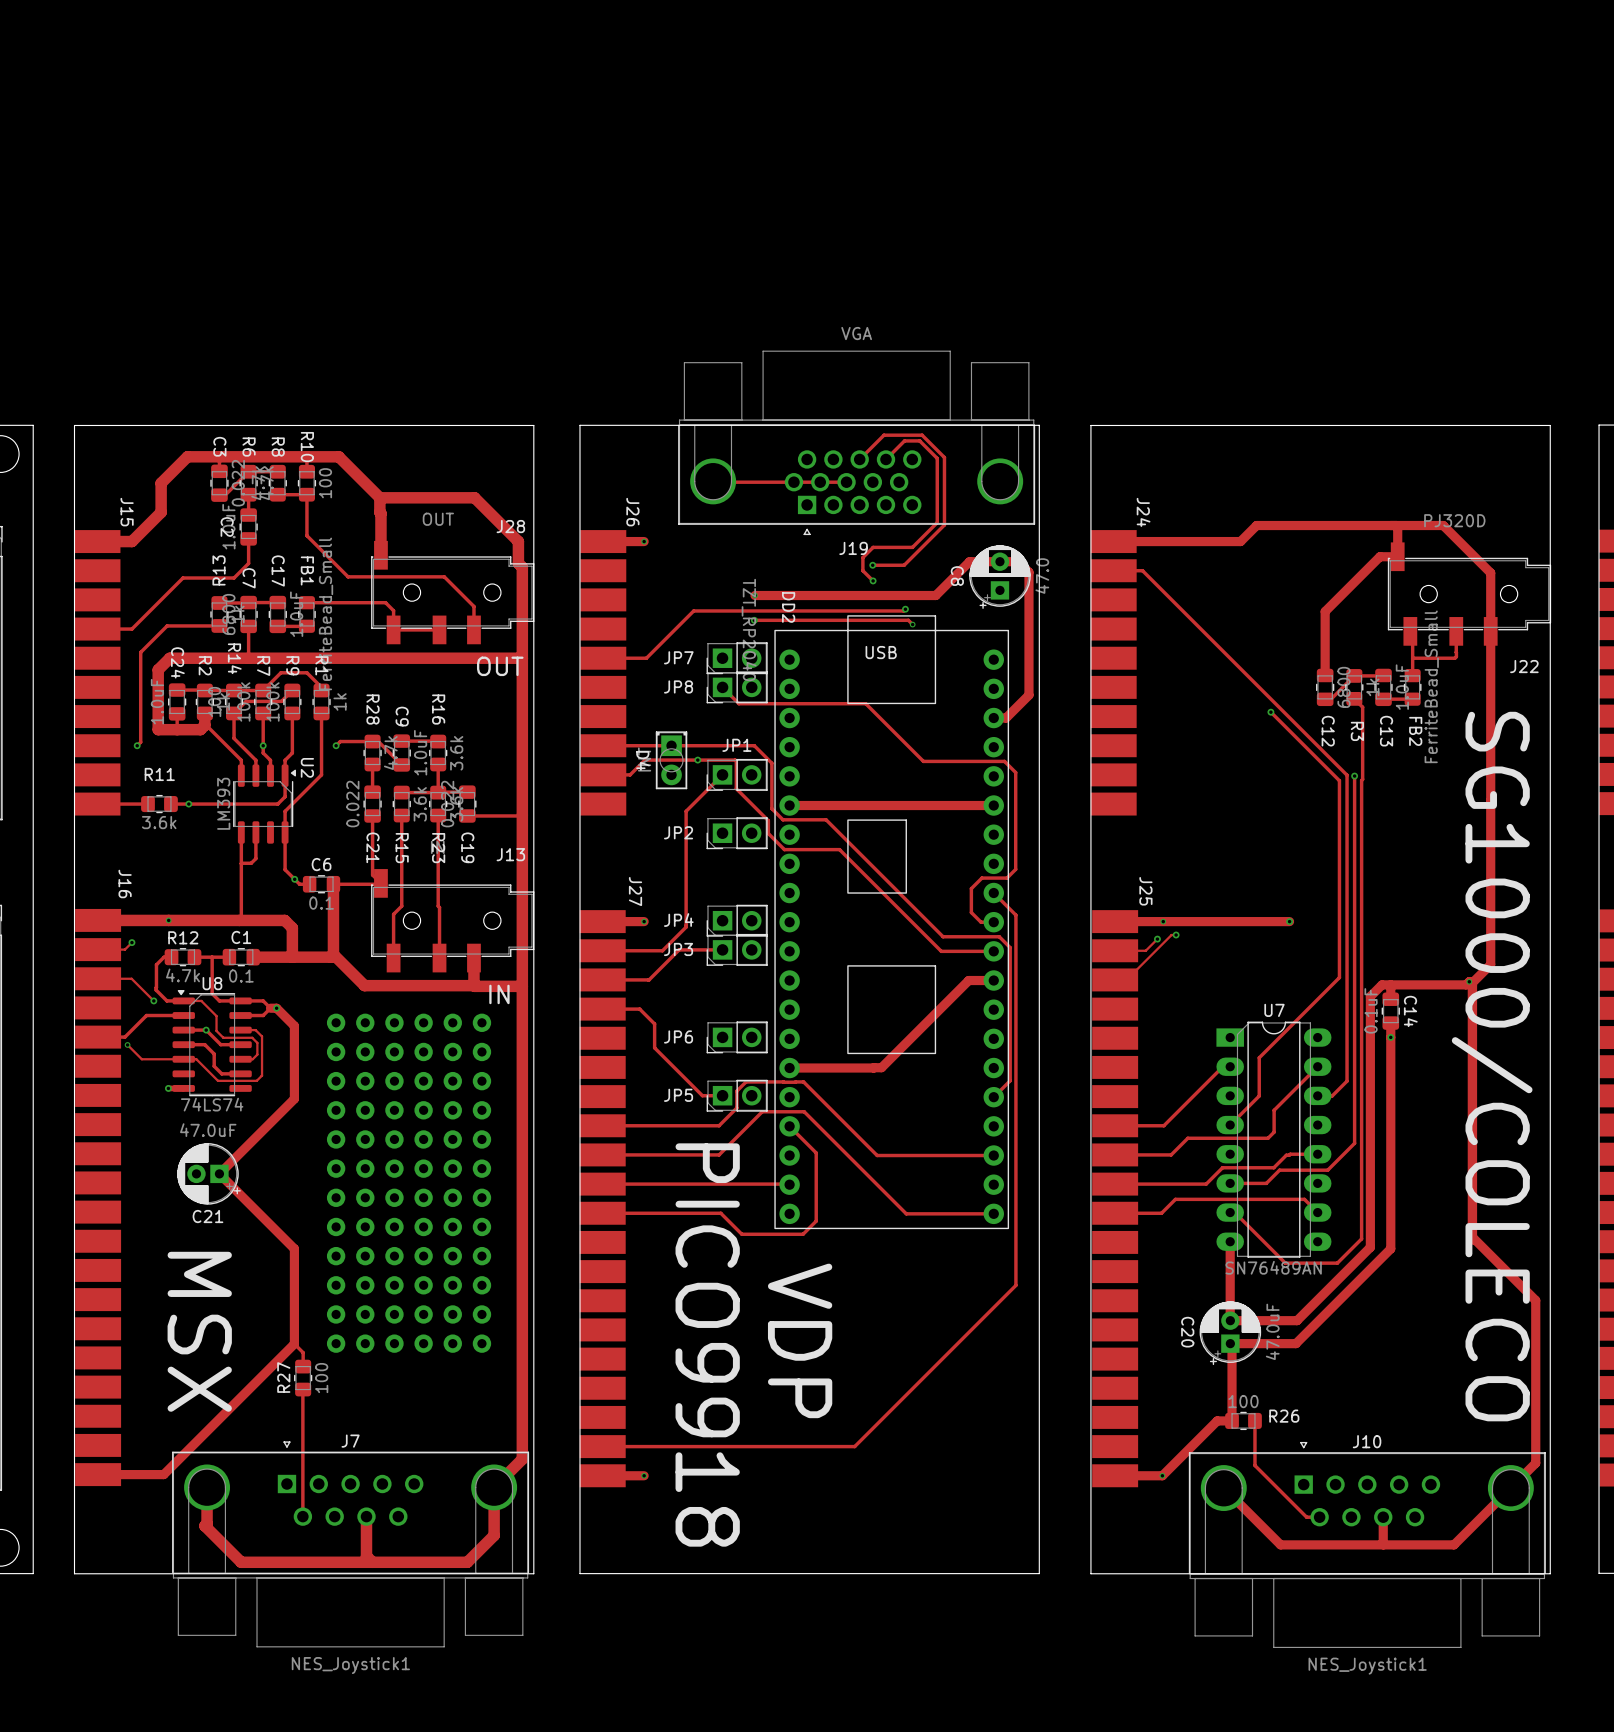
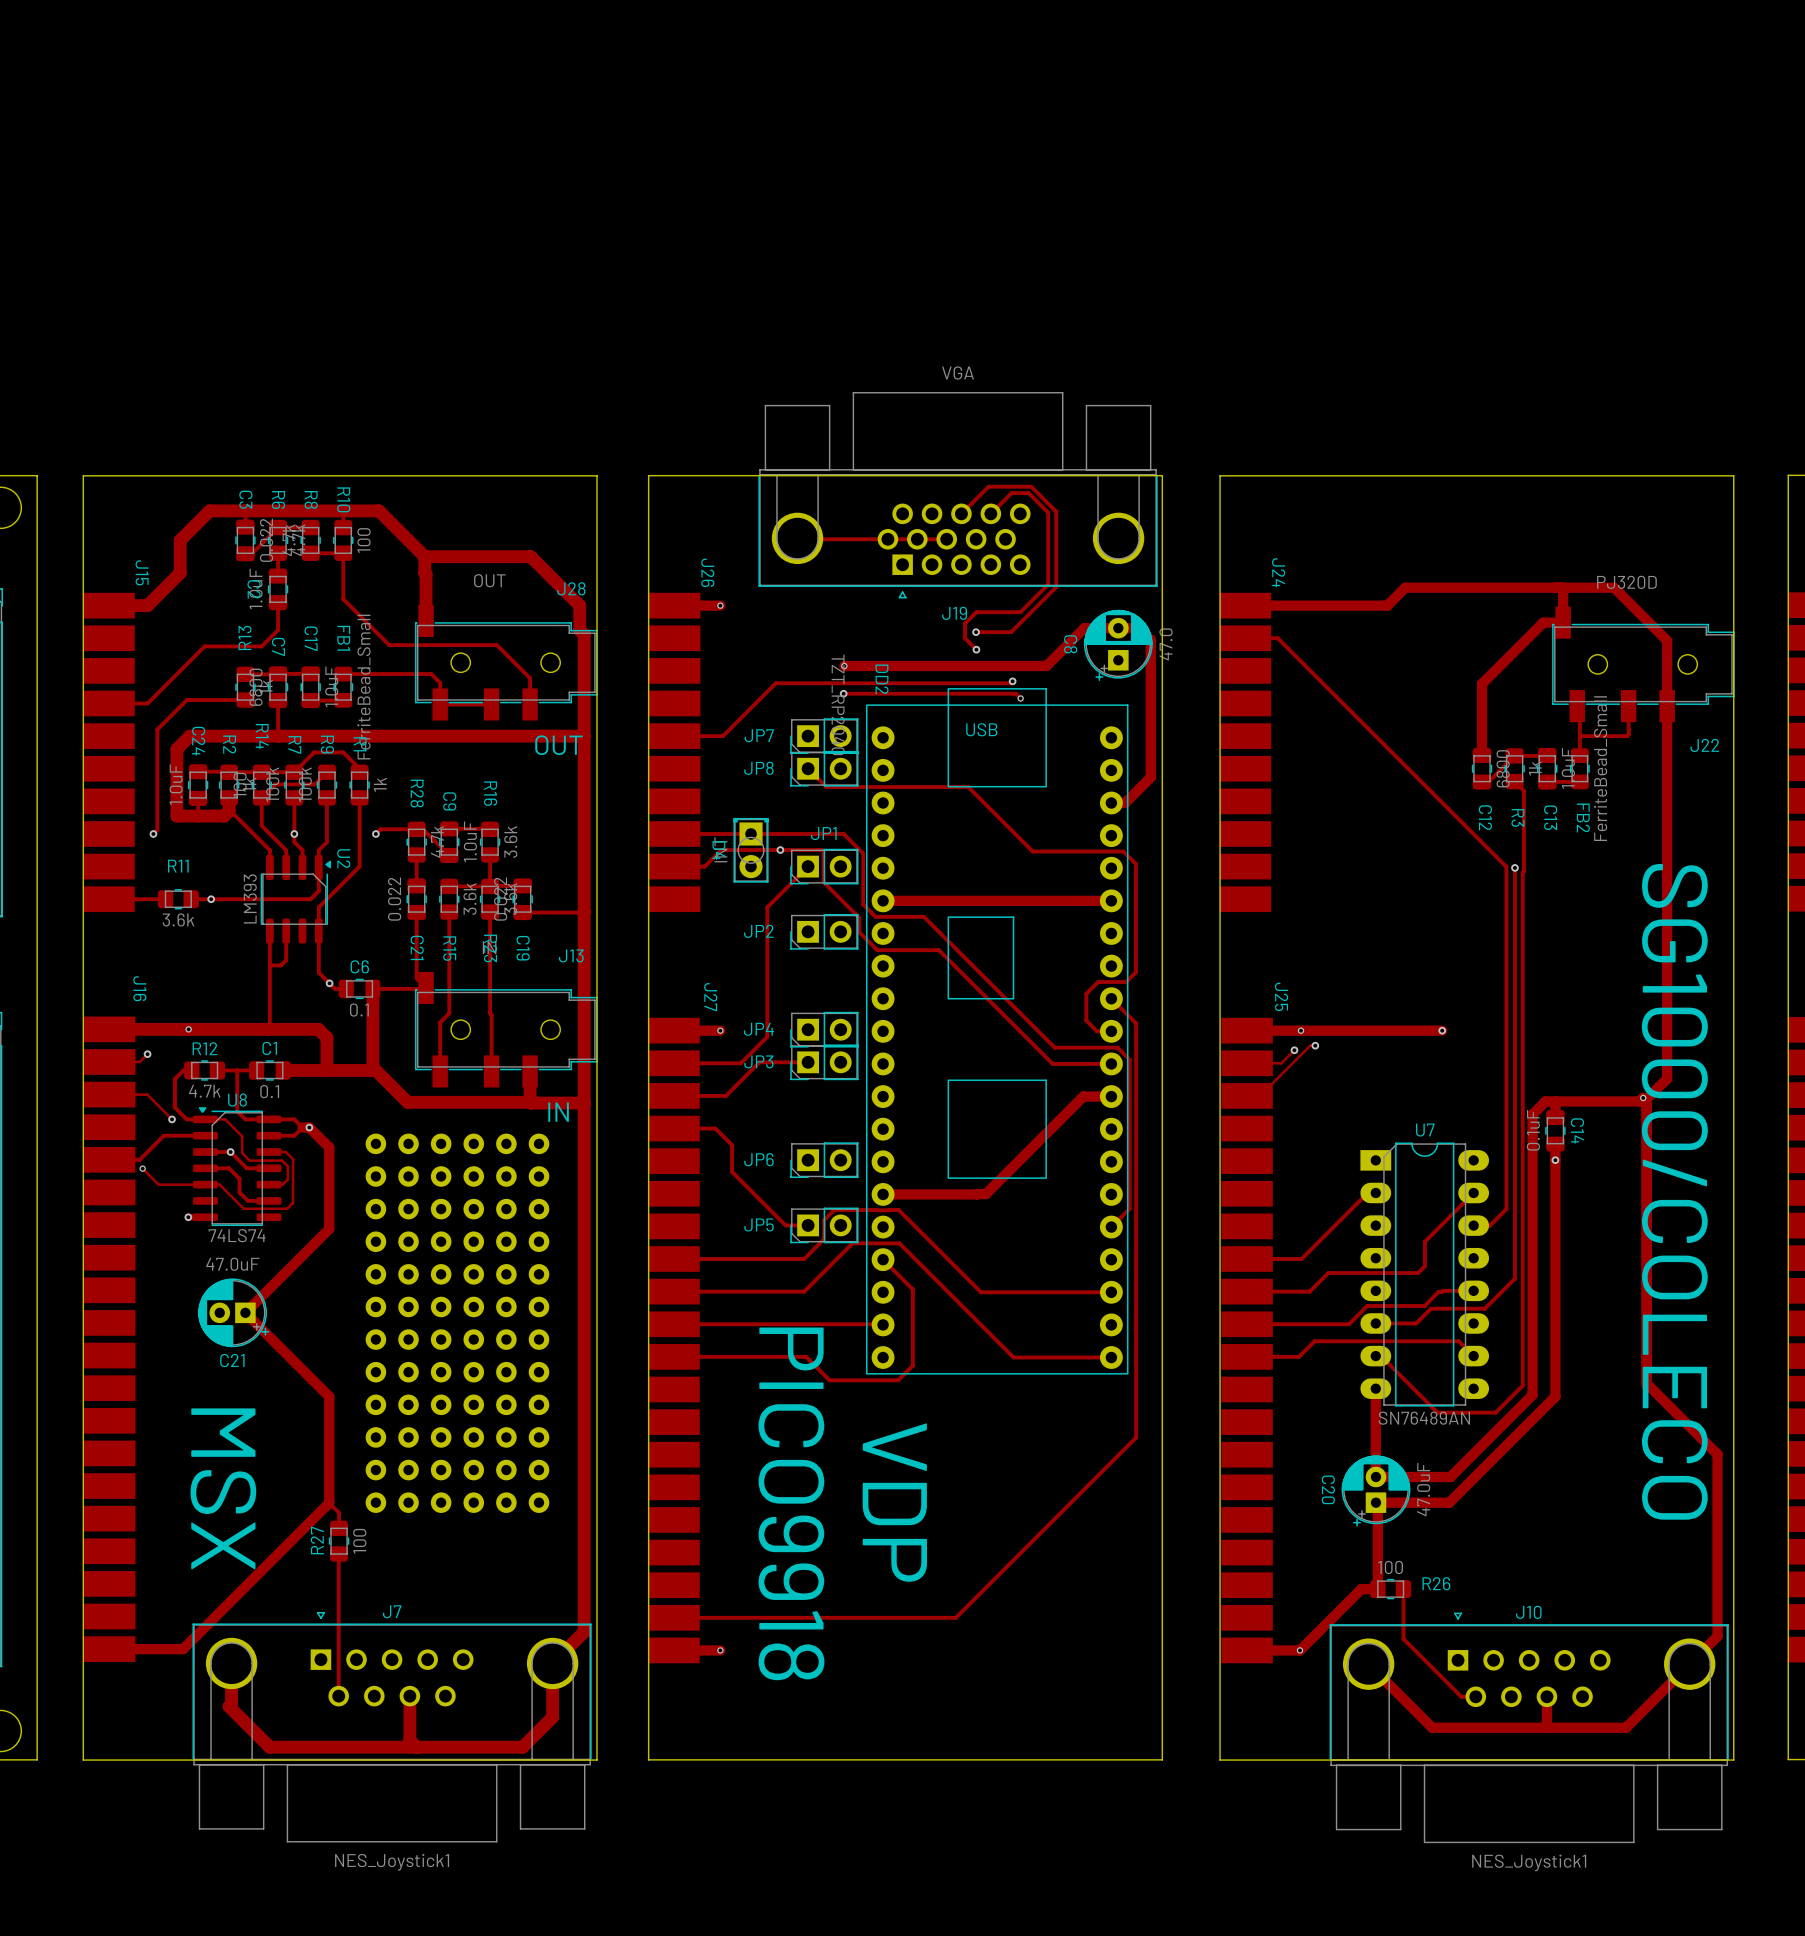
track: (1270, 712) (1339, 780) (1339, 977) (1259, 1057) (1259, 1096) (1230, 1125) -> none
via: (1270, 712) -> none

